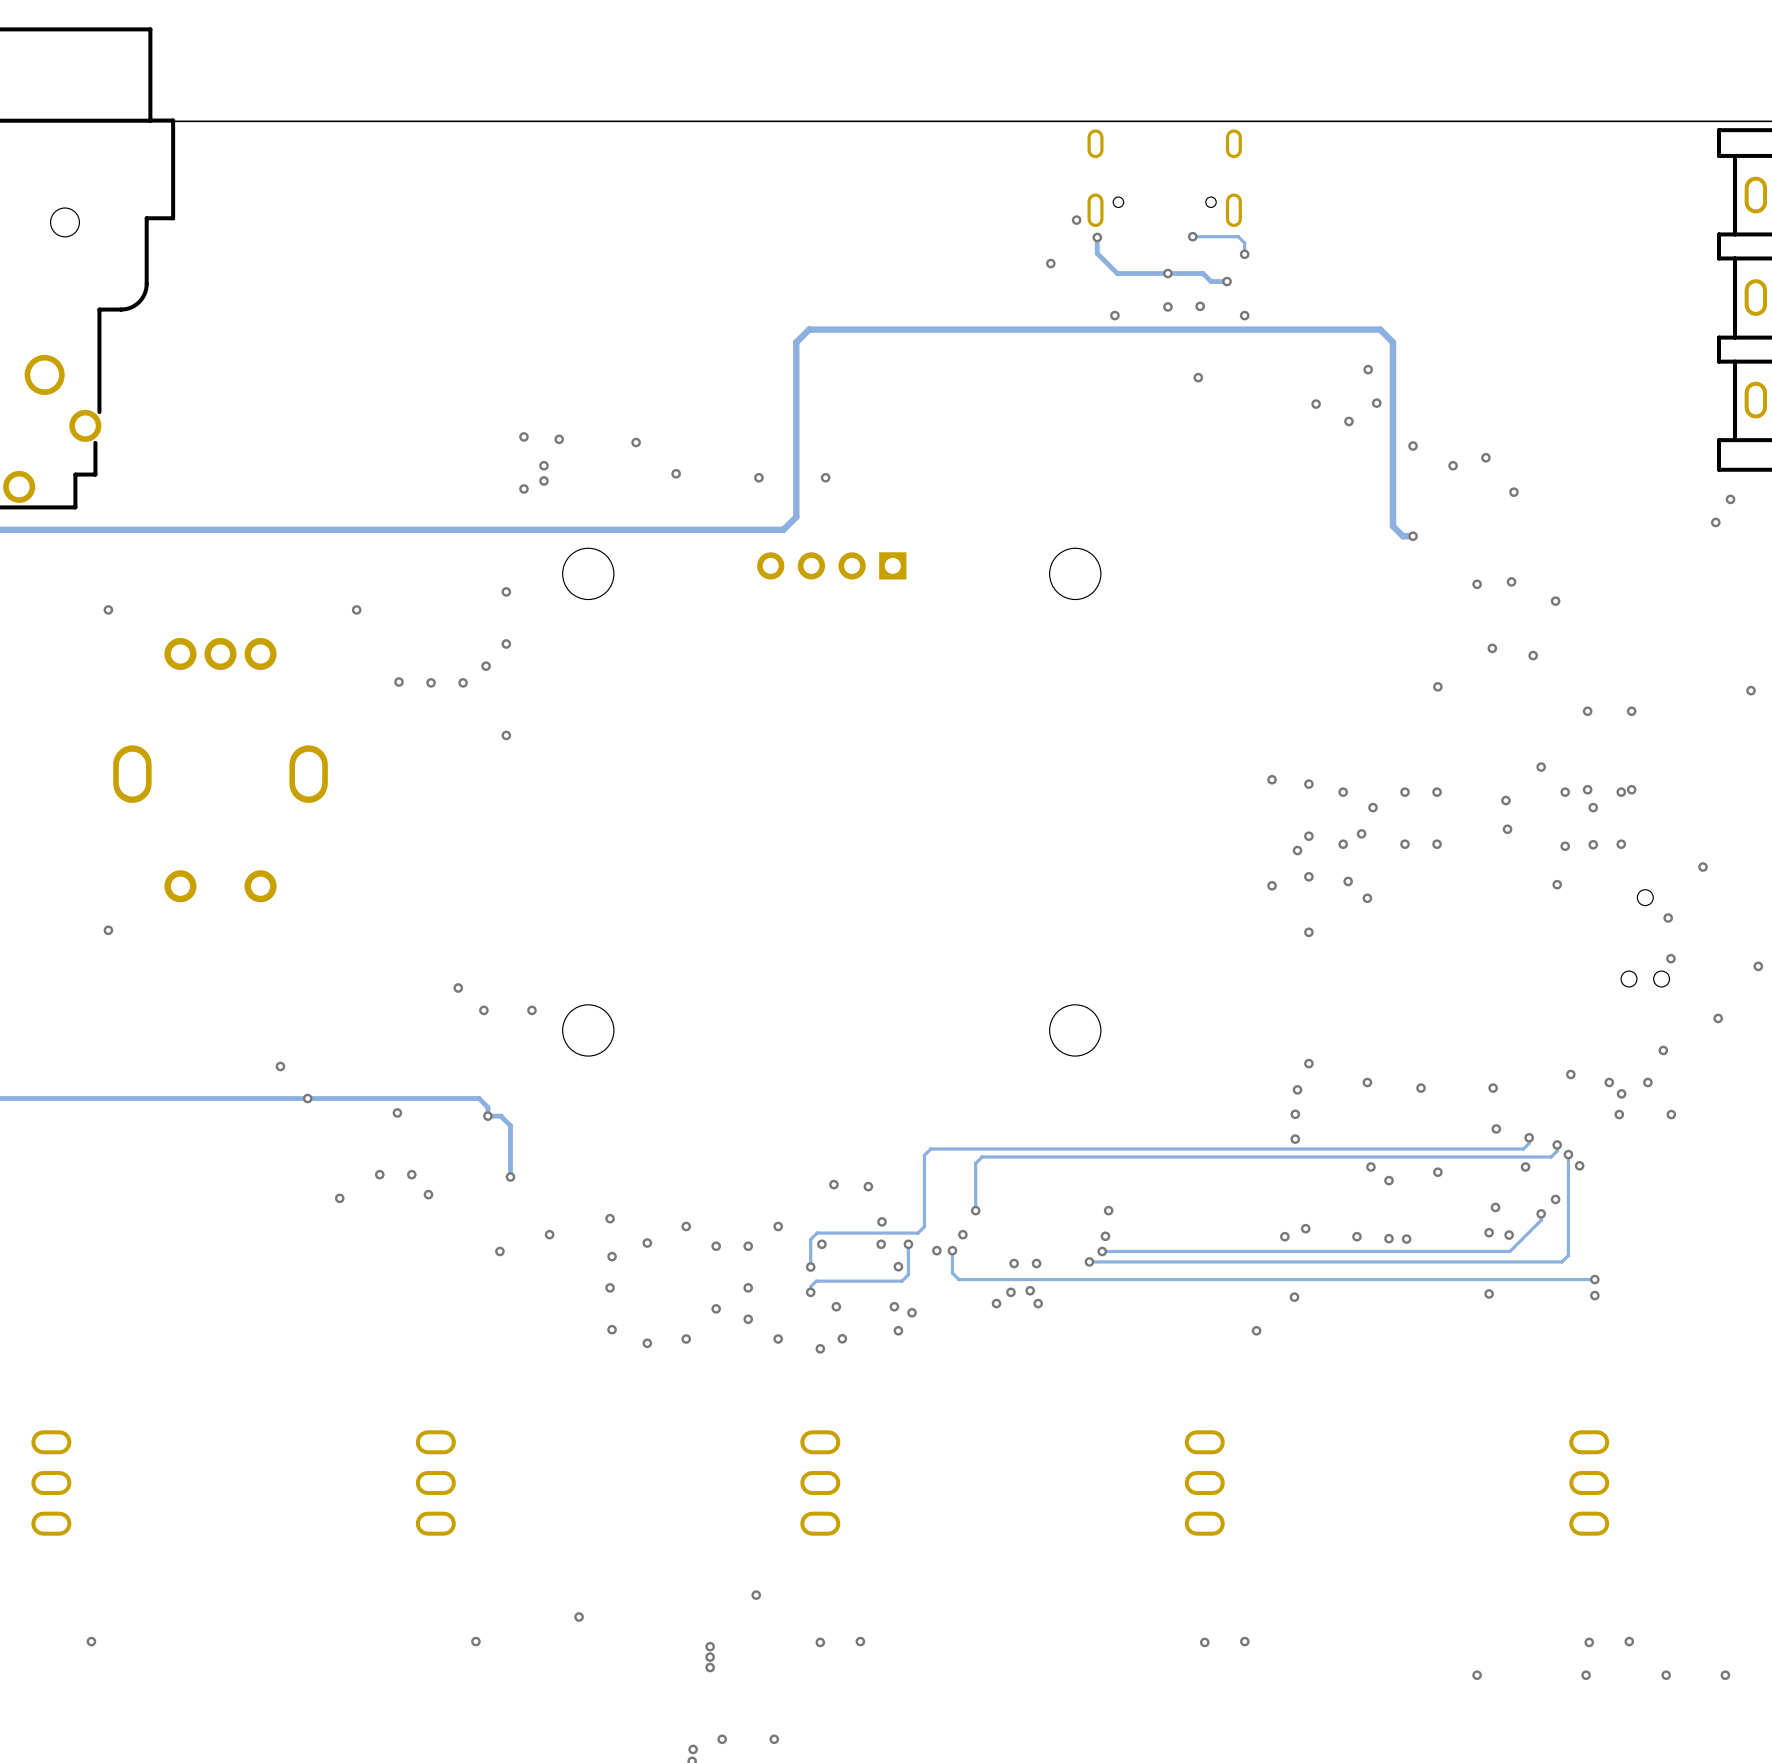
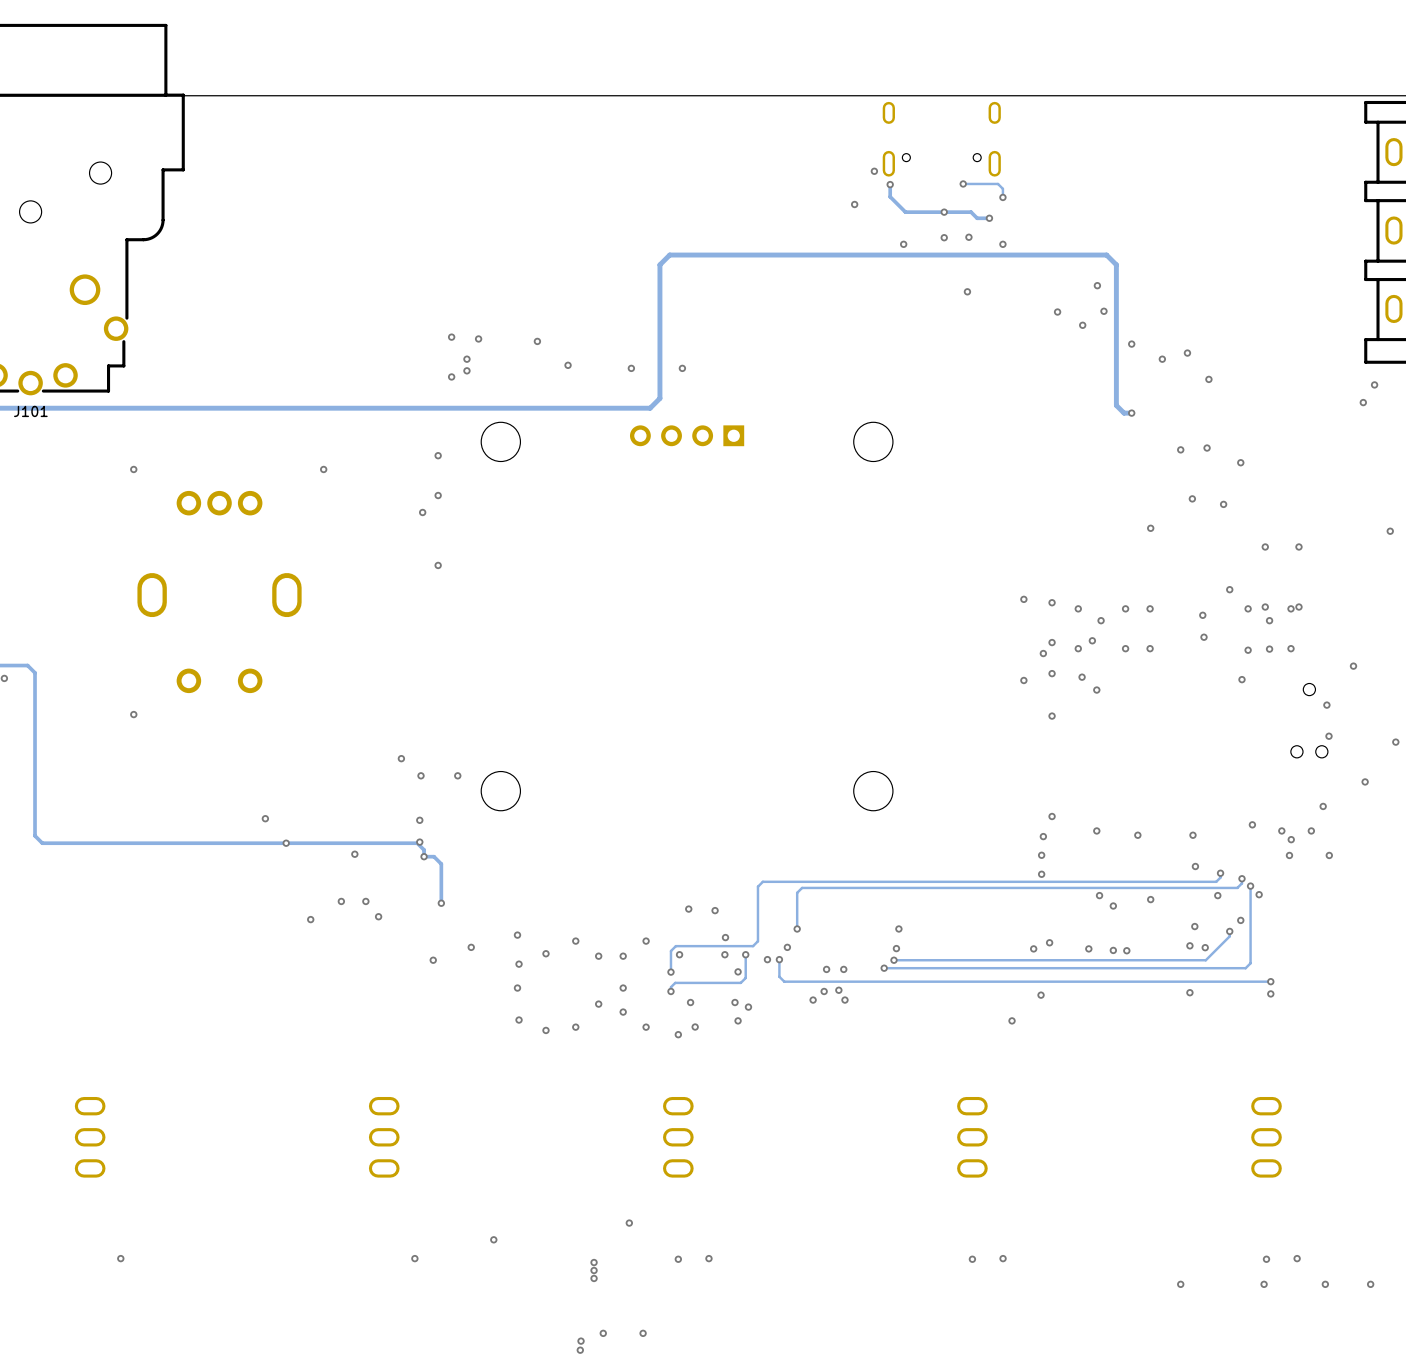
via: (399, 682) -> none
via: (431, 682) -> none
via: (463, 682) -> none
via: none -> (419, 820)
via: none -> (419, 842)

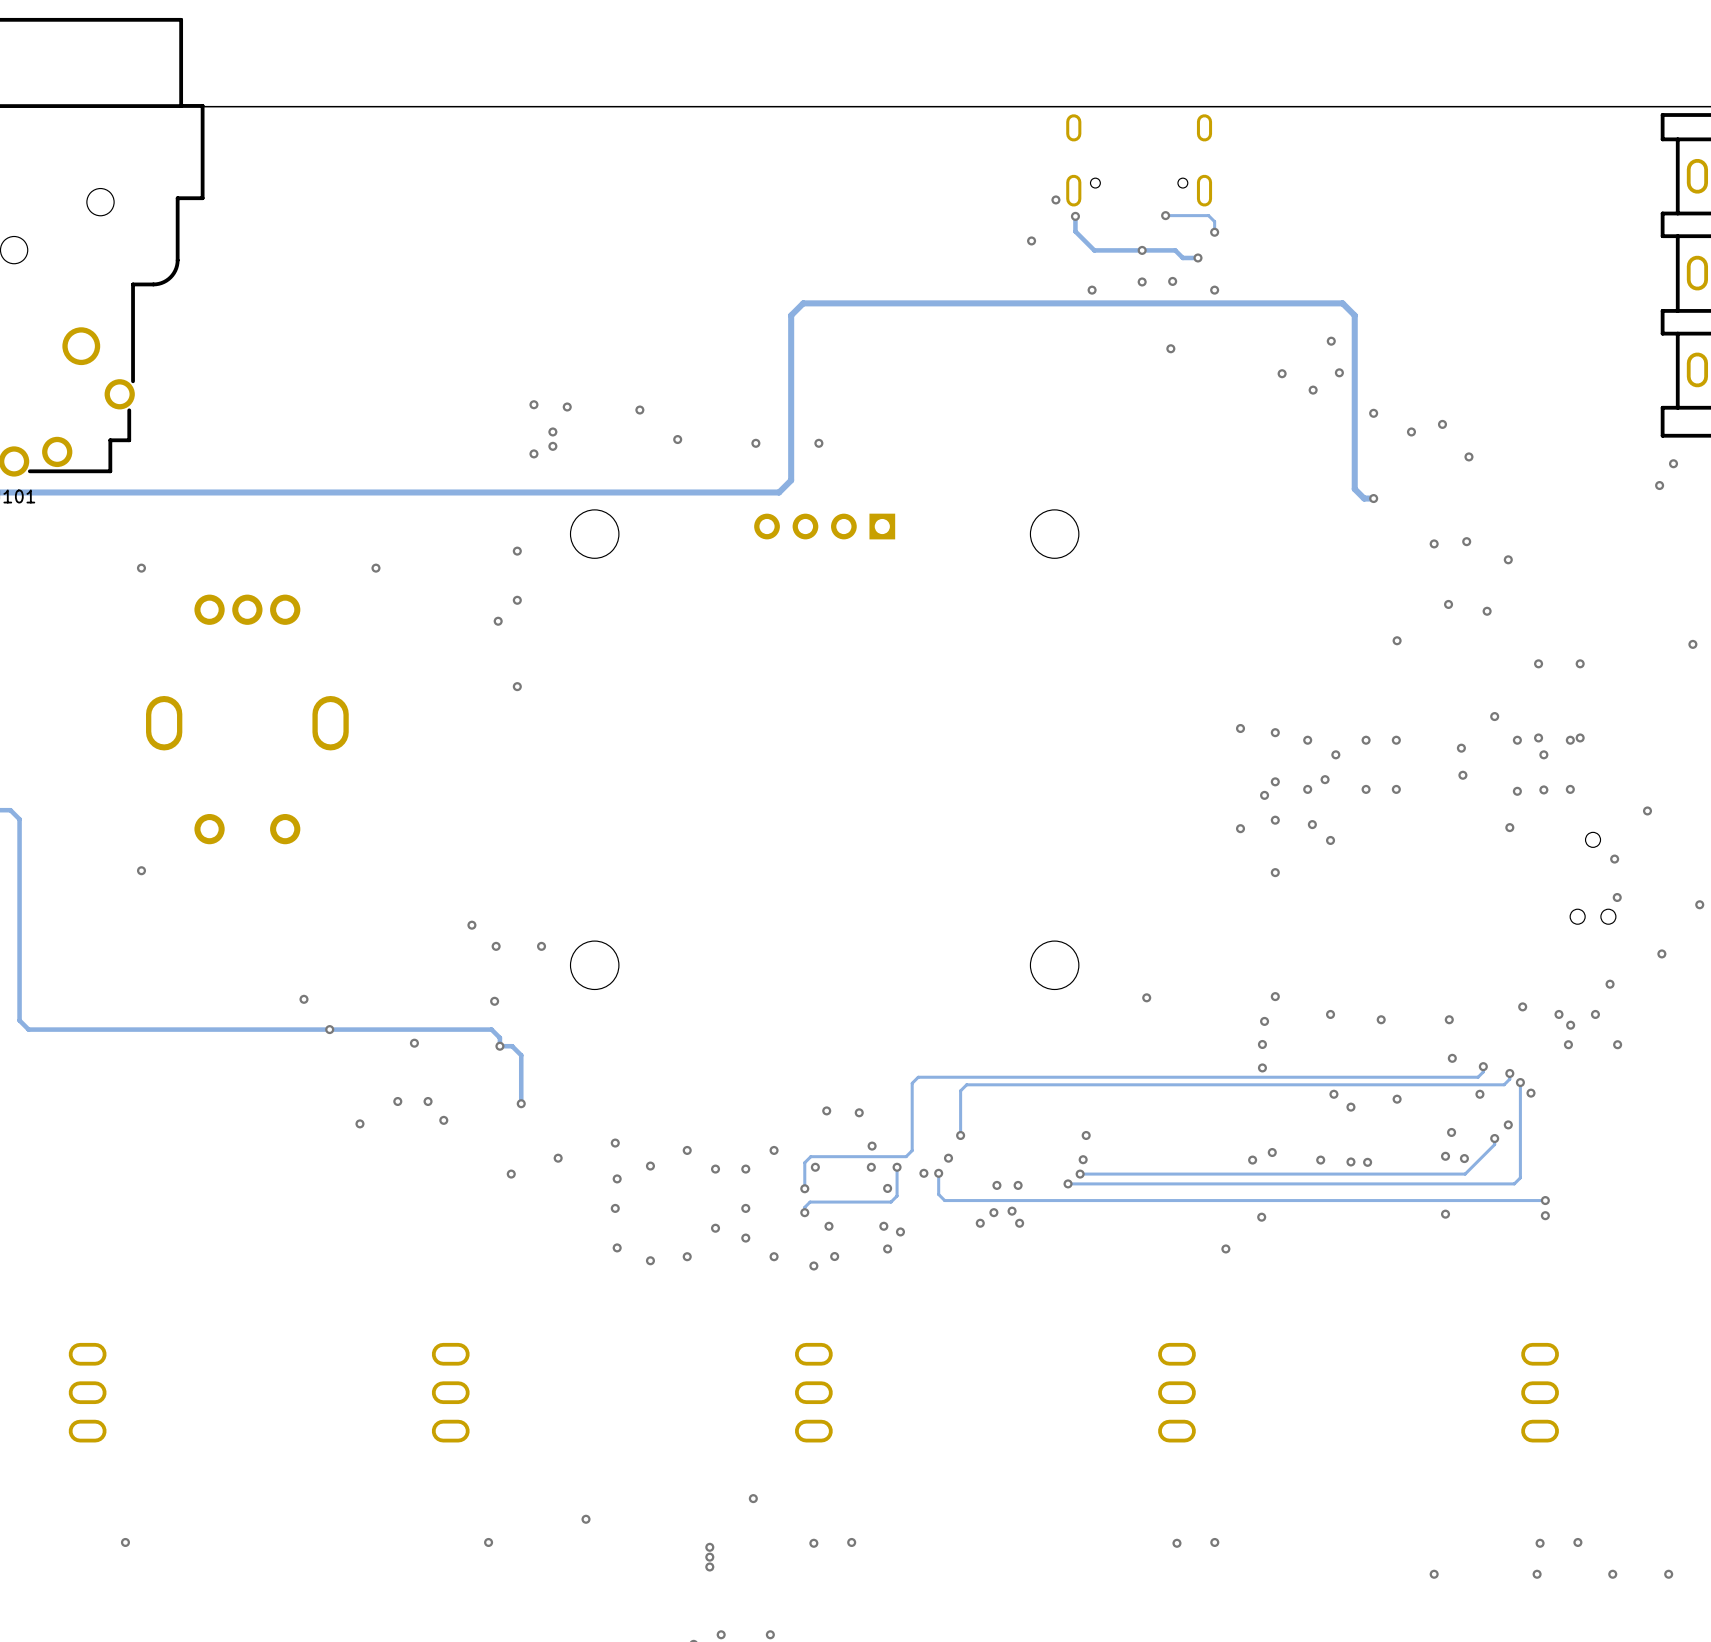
via: none -> (1146, 997)
via: (419, 842) -> none

